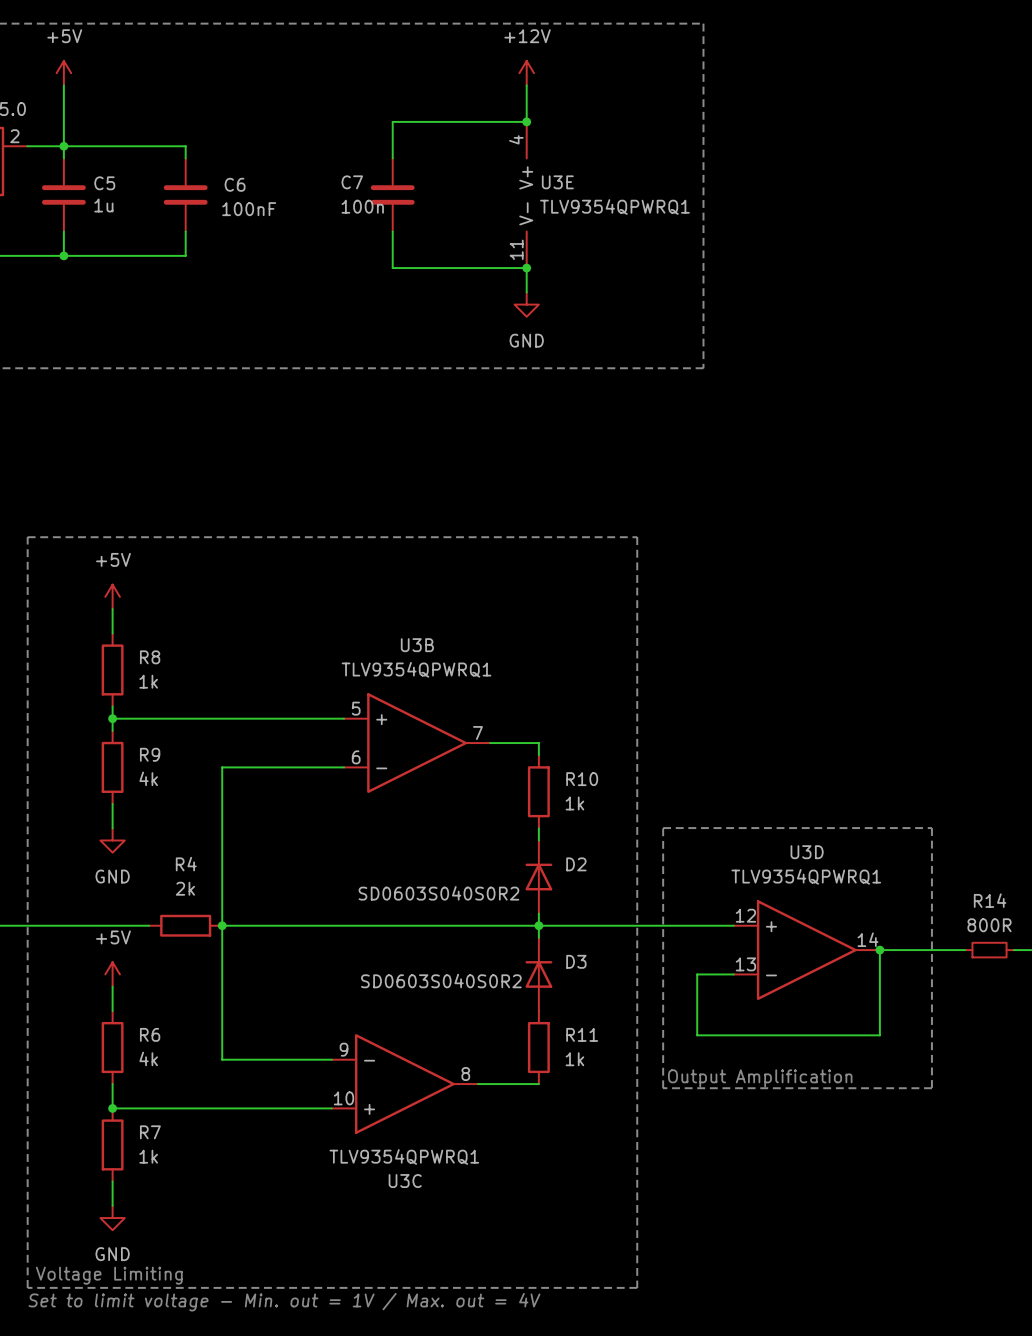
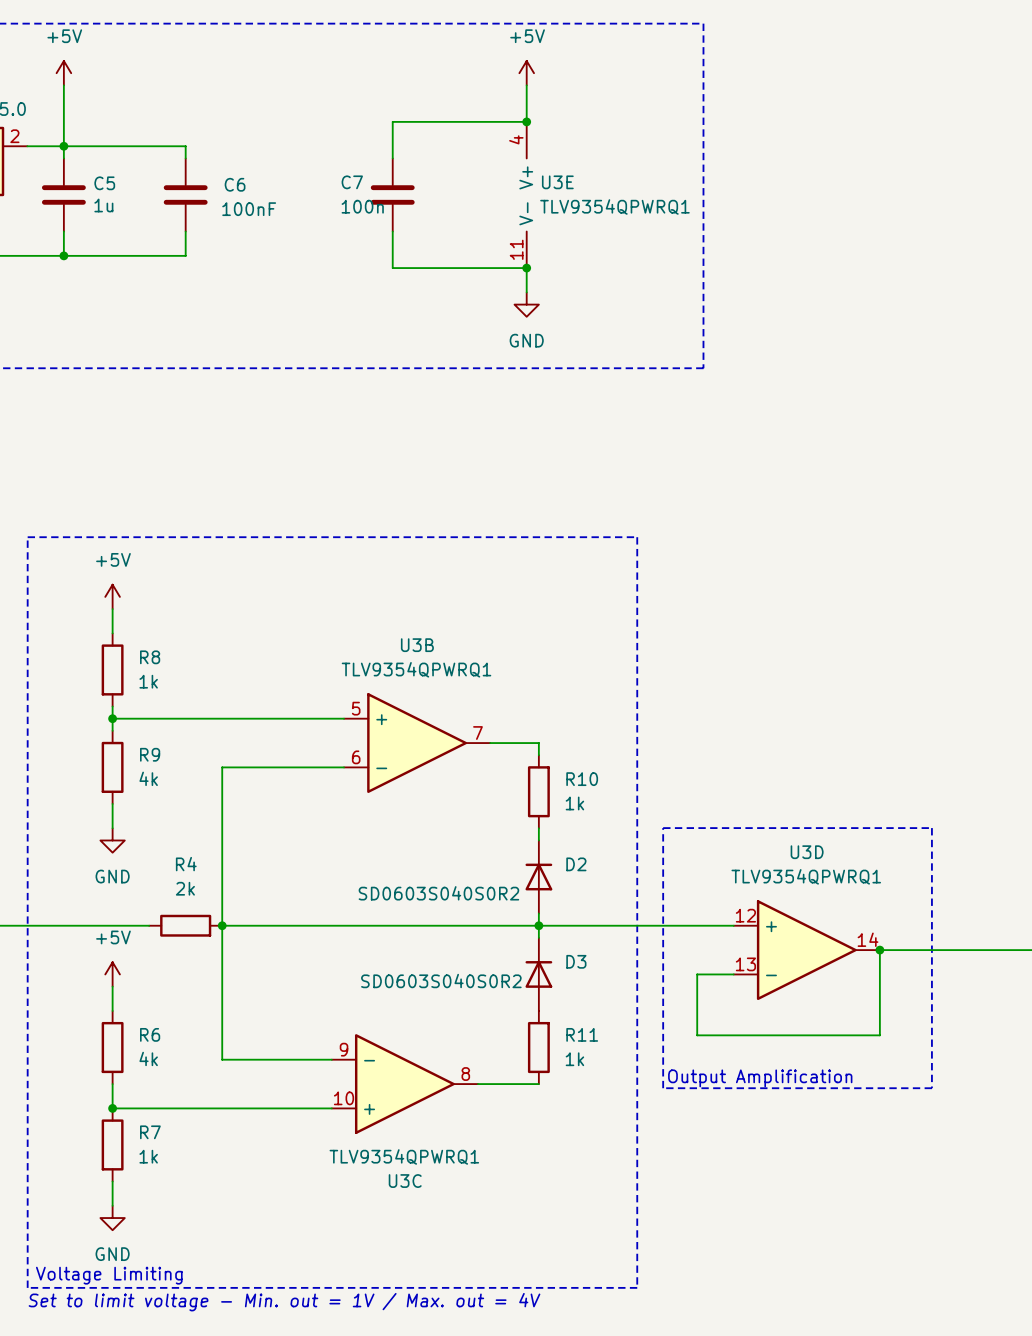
power symbol: +12V (526, 73) -> +5V (526, 73)
wire: none -> (965, 950) (1013, 950)
R14: 800R (989, 950) -> none

